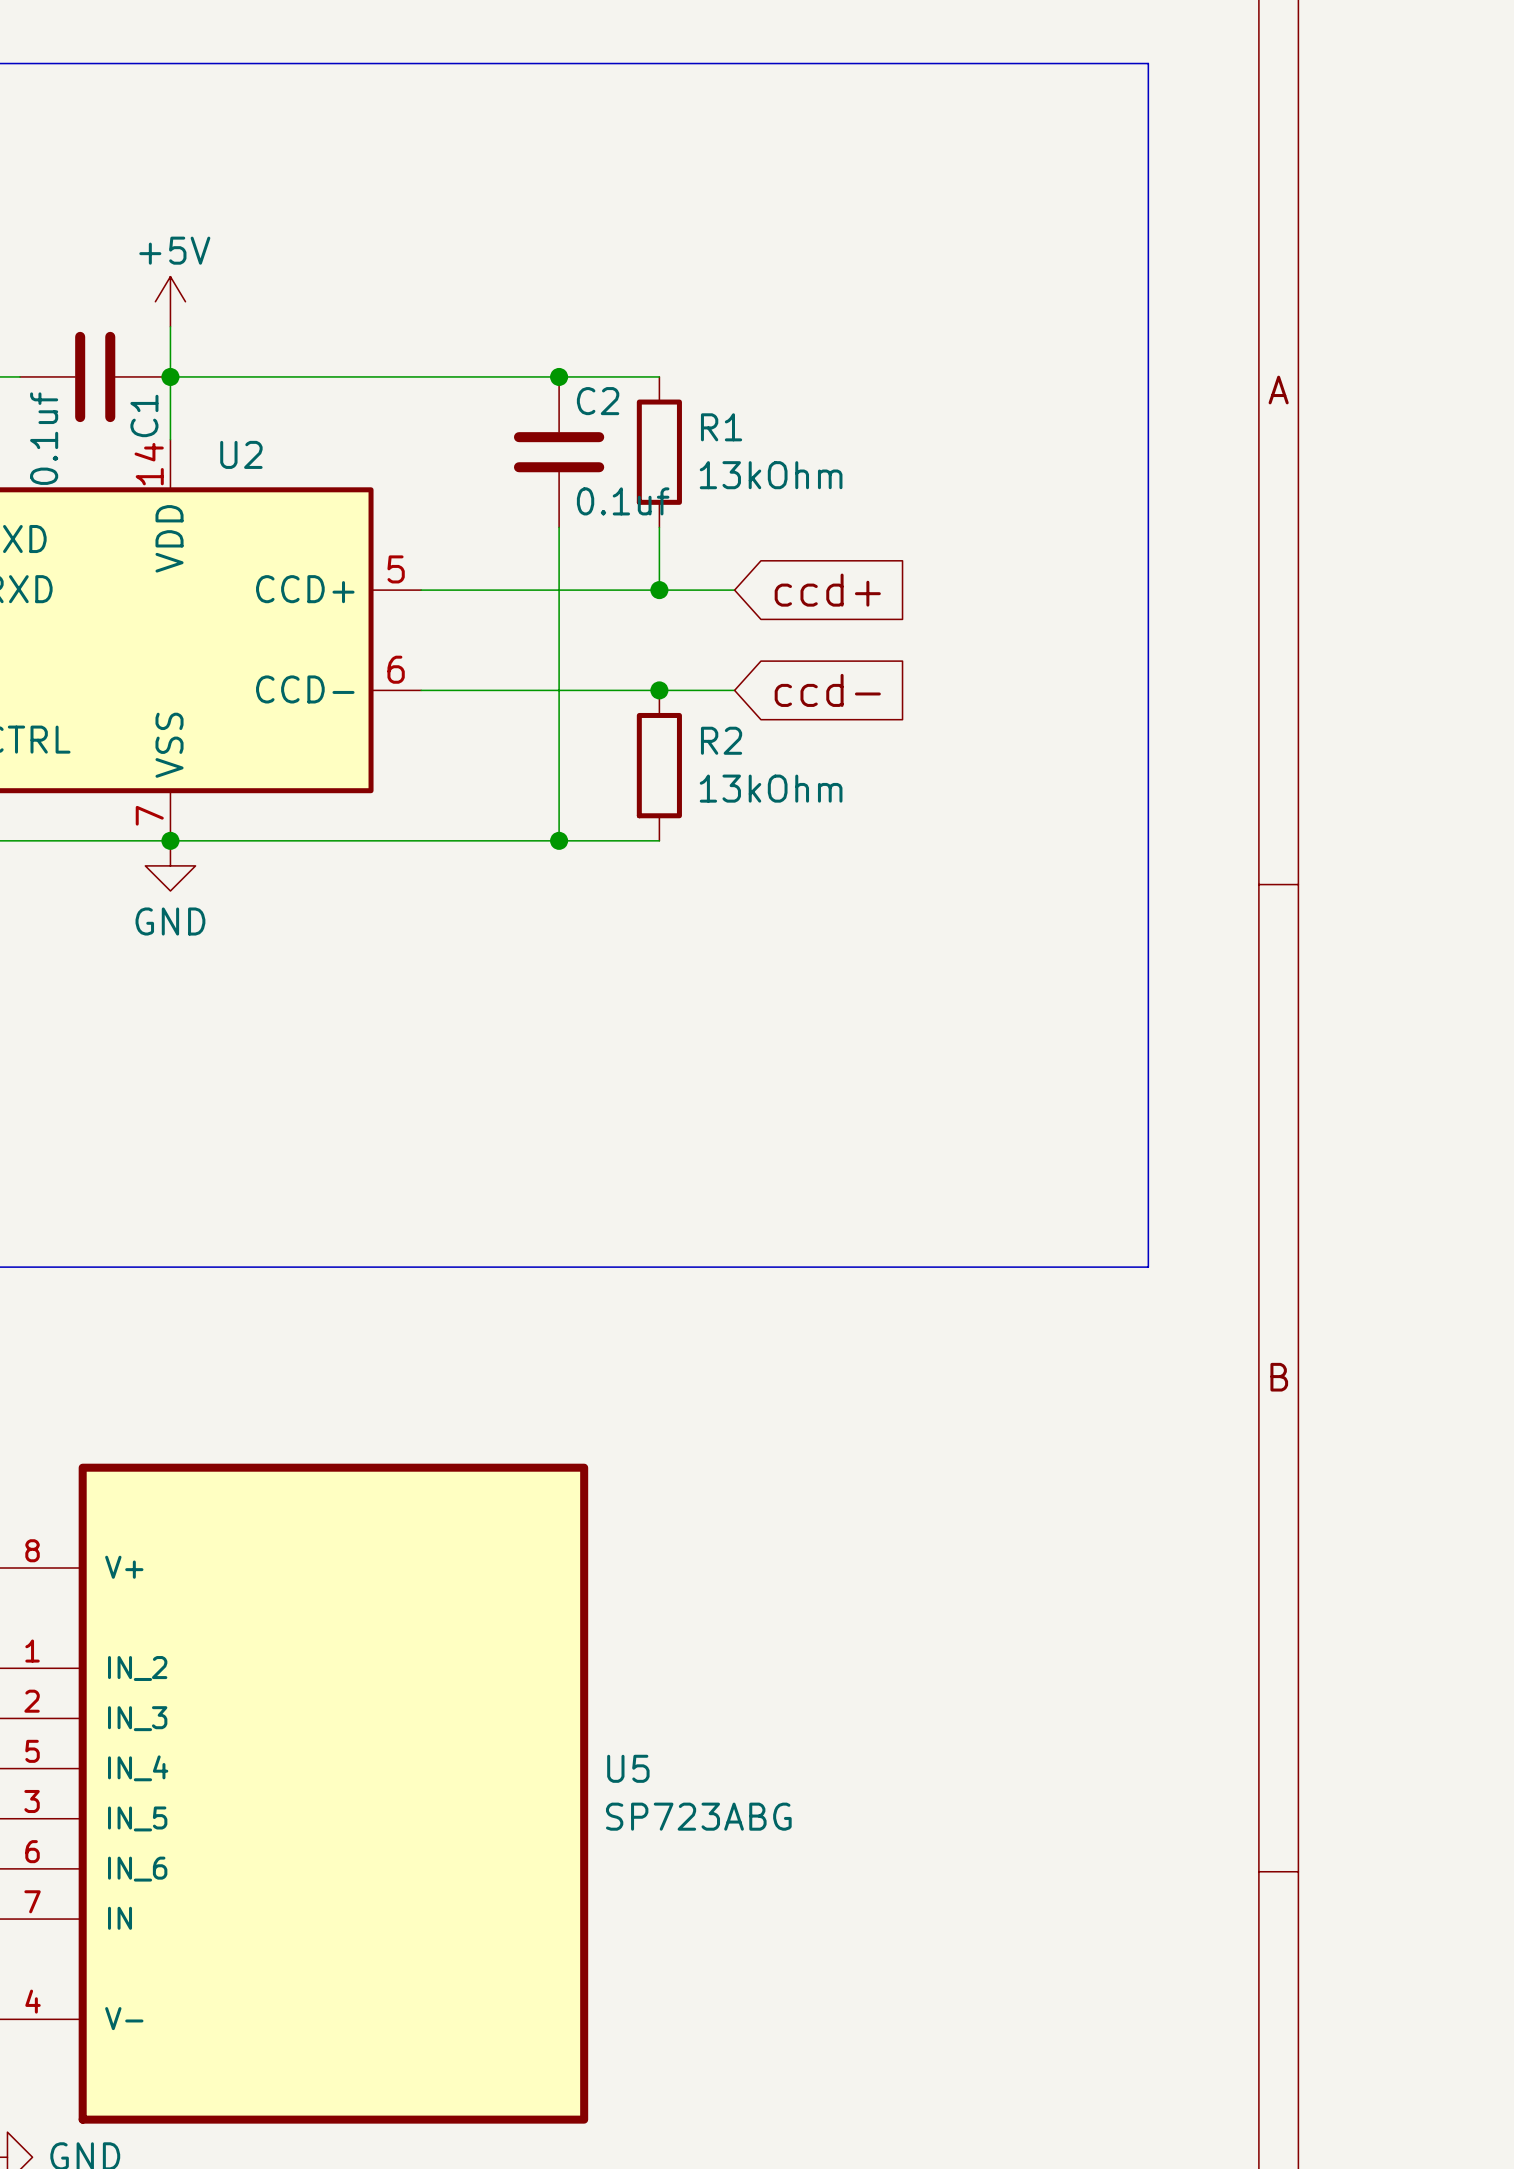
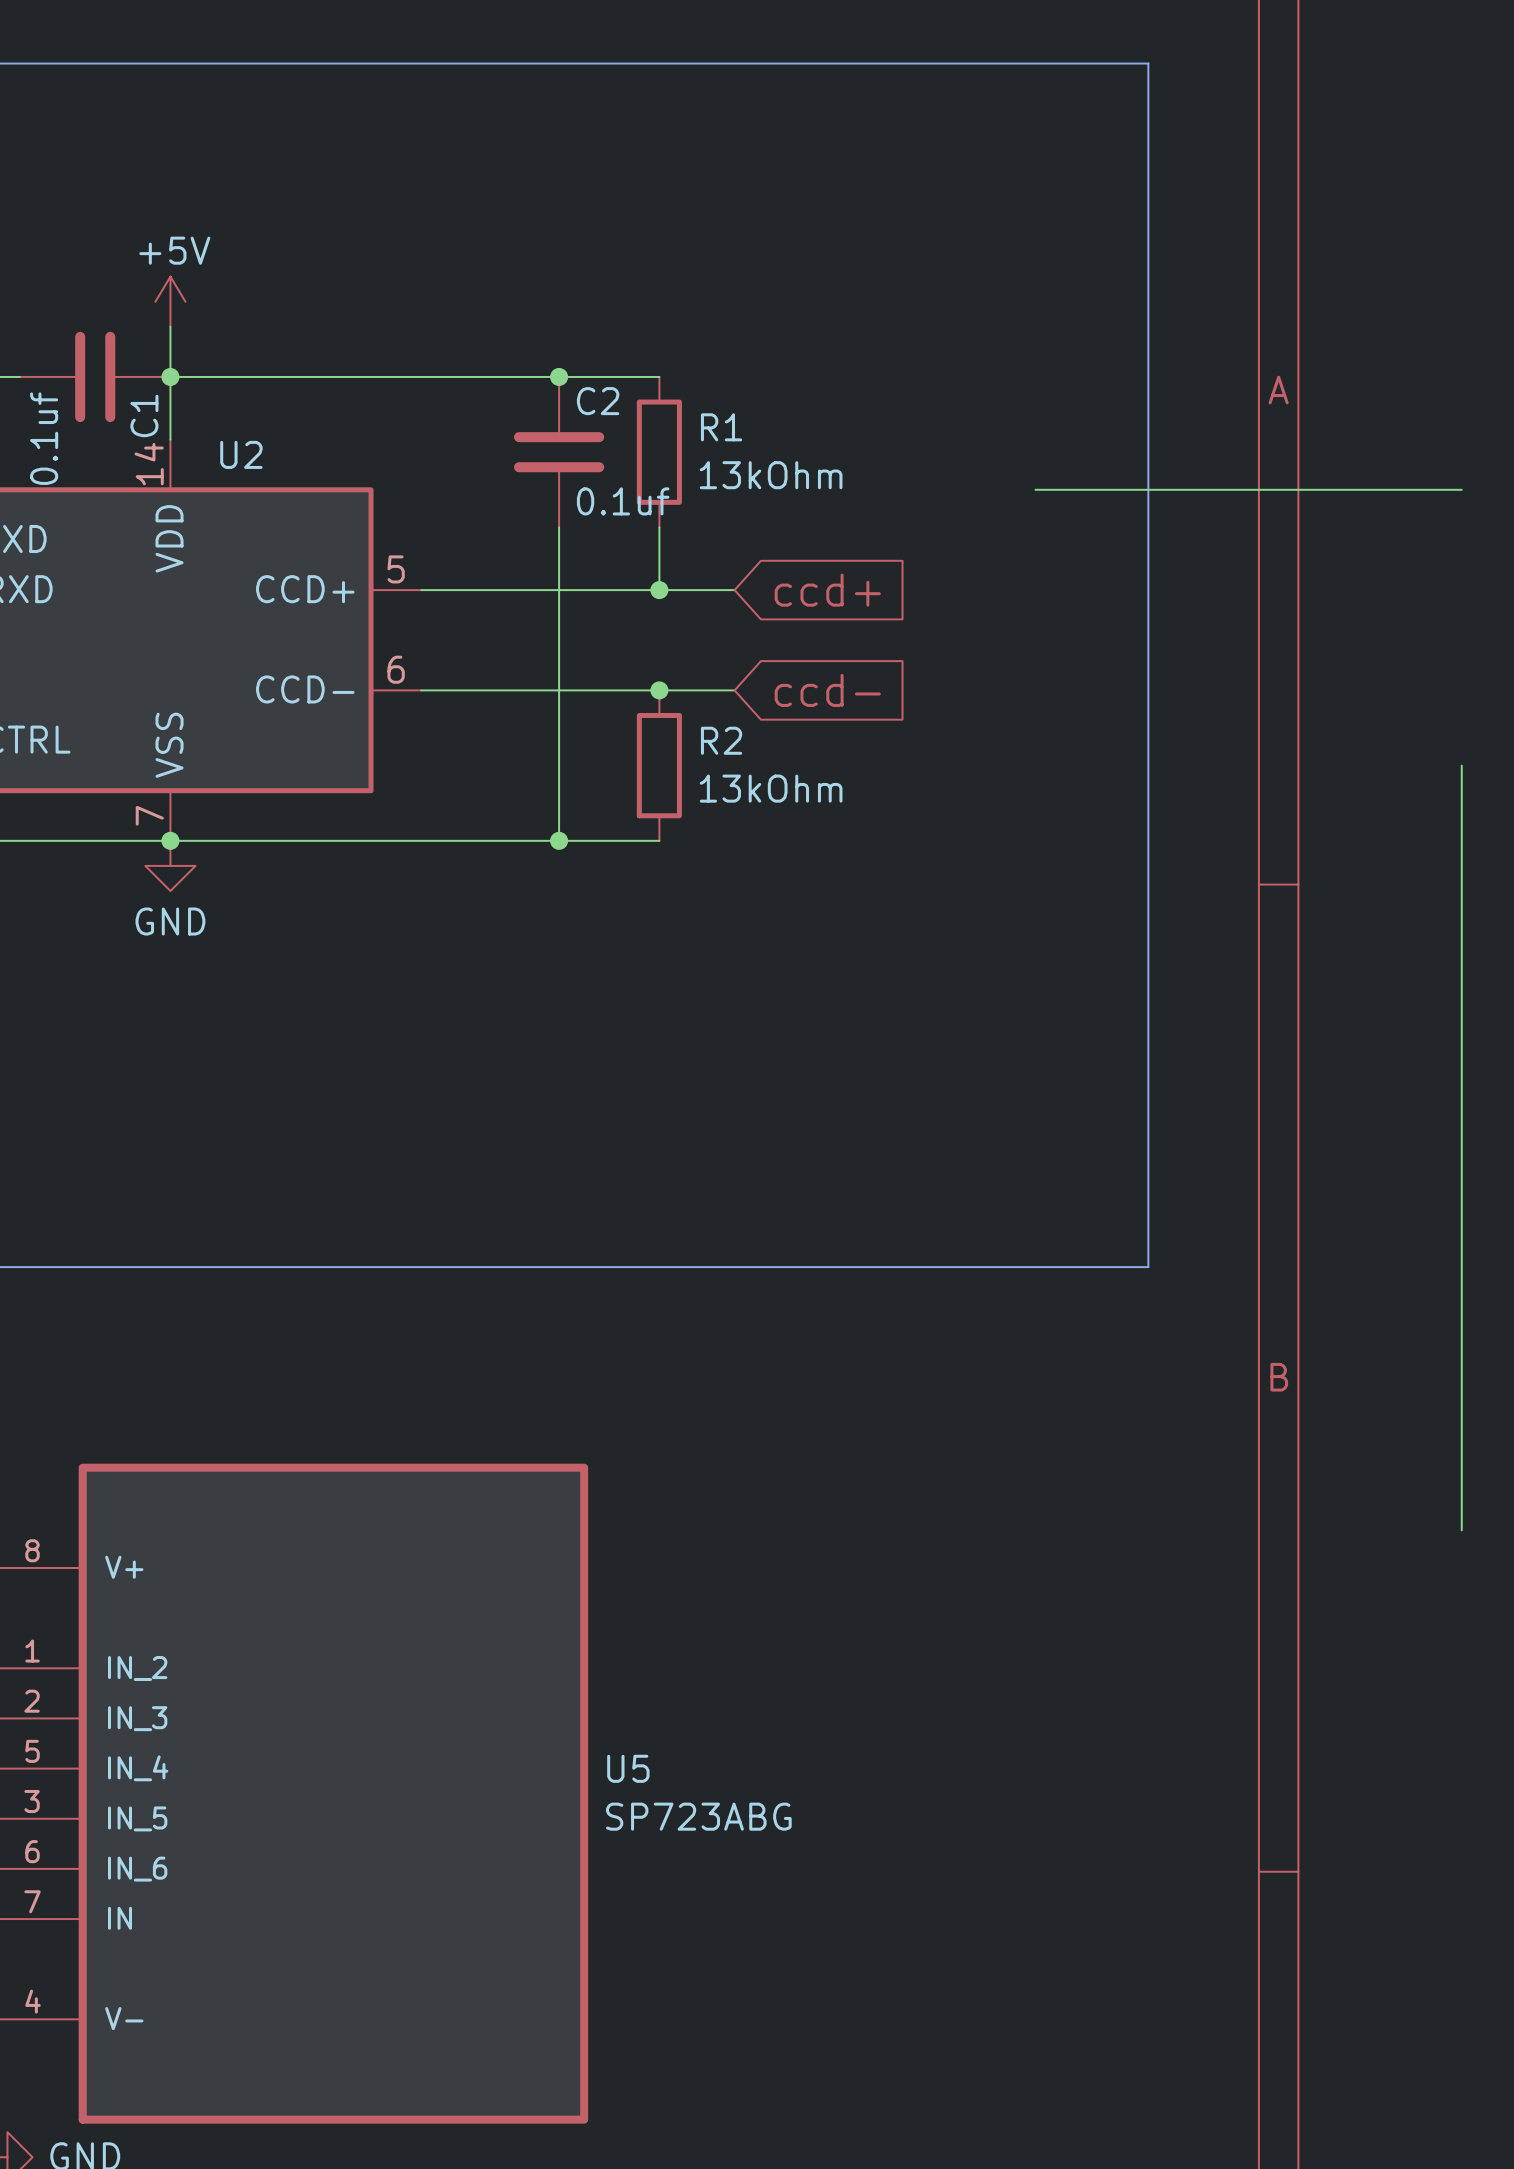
wire: none -> (1035, 489) (1461, 489)
wire: none -> (1461, 765) (1461, 1530)

